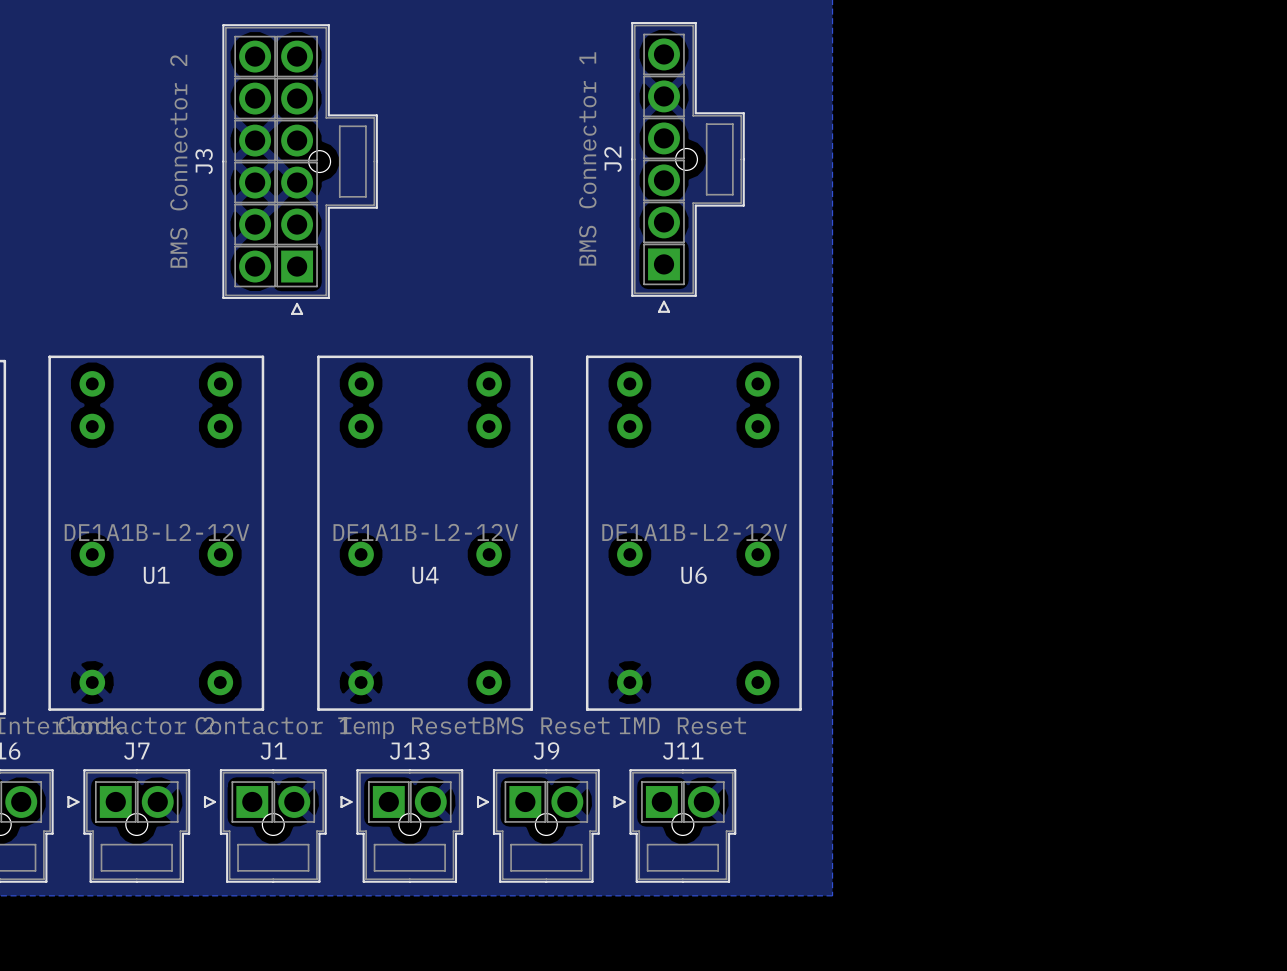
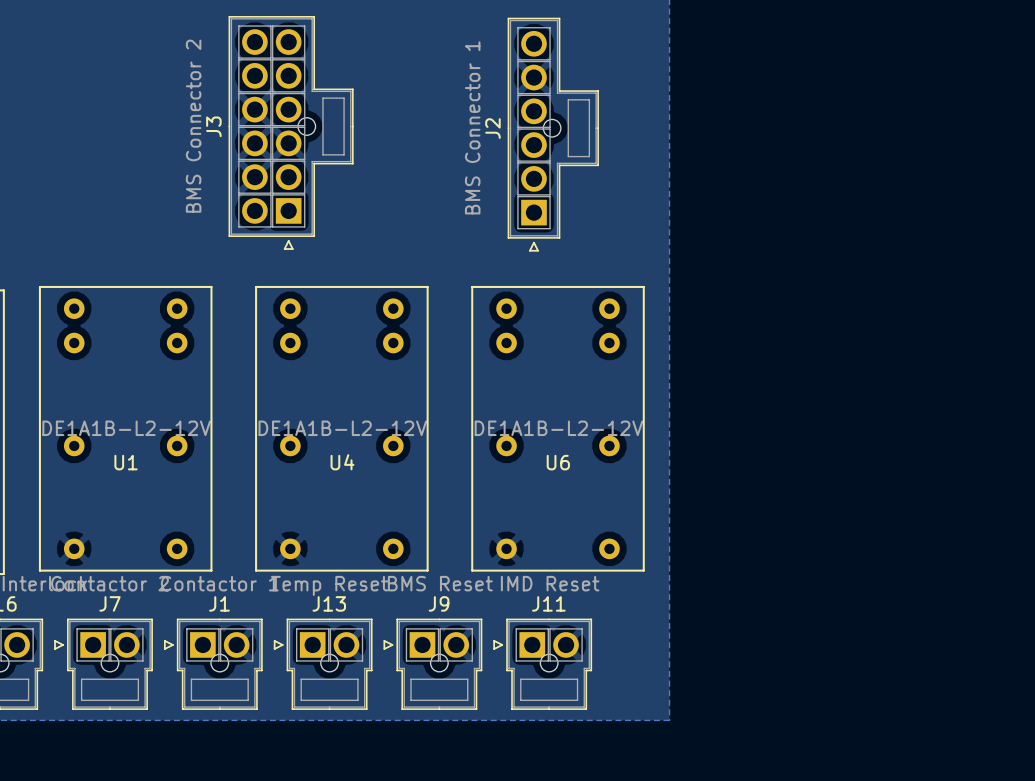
J3 position: (300, 169) -> (291, 132)

